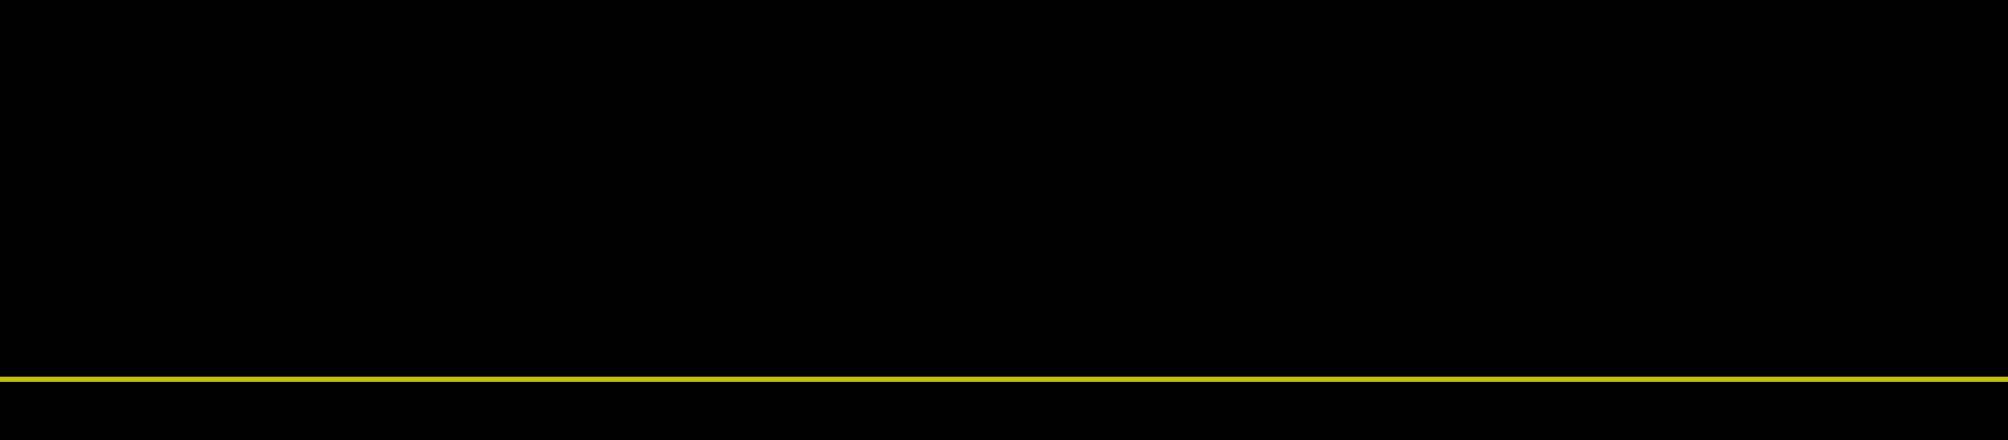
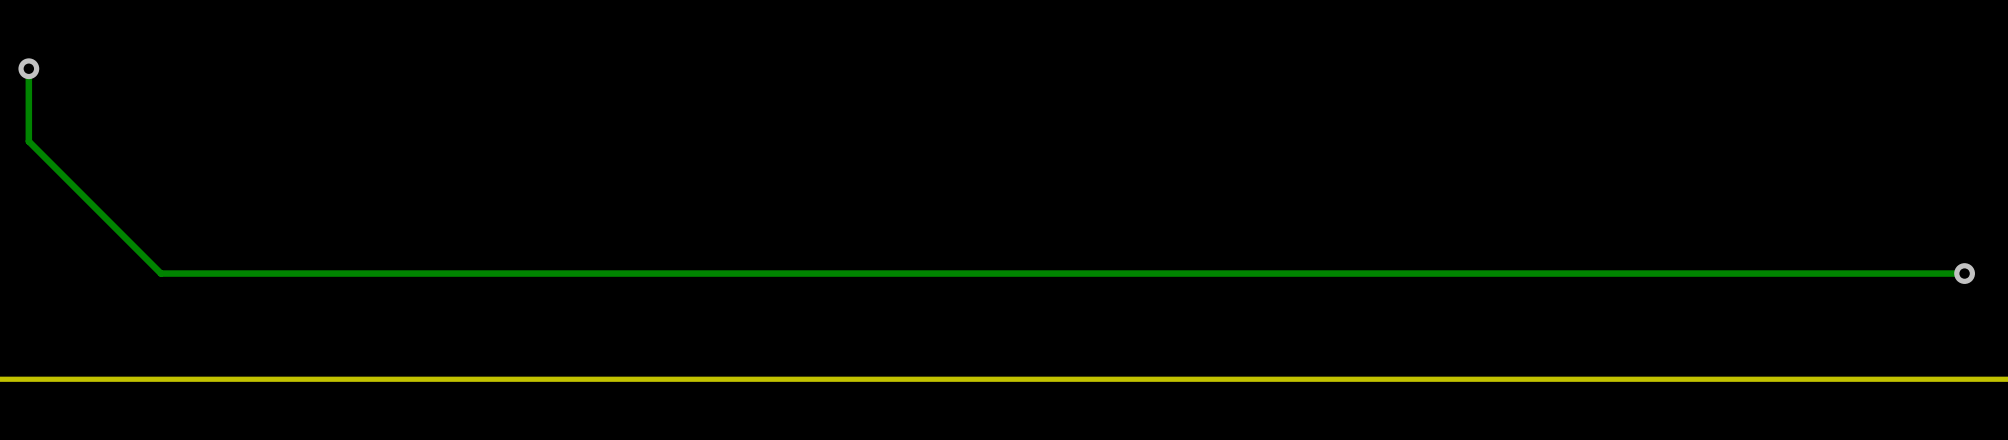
track: none -> (28, 68) (28, 141) (160, 273) (1964, 273)
via: none -> (28, 68)
via: none -> (1964, 273)

